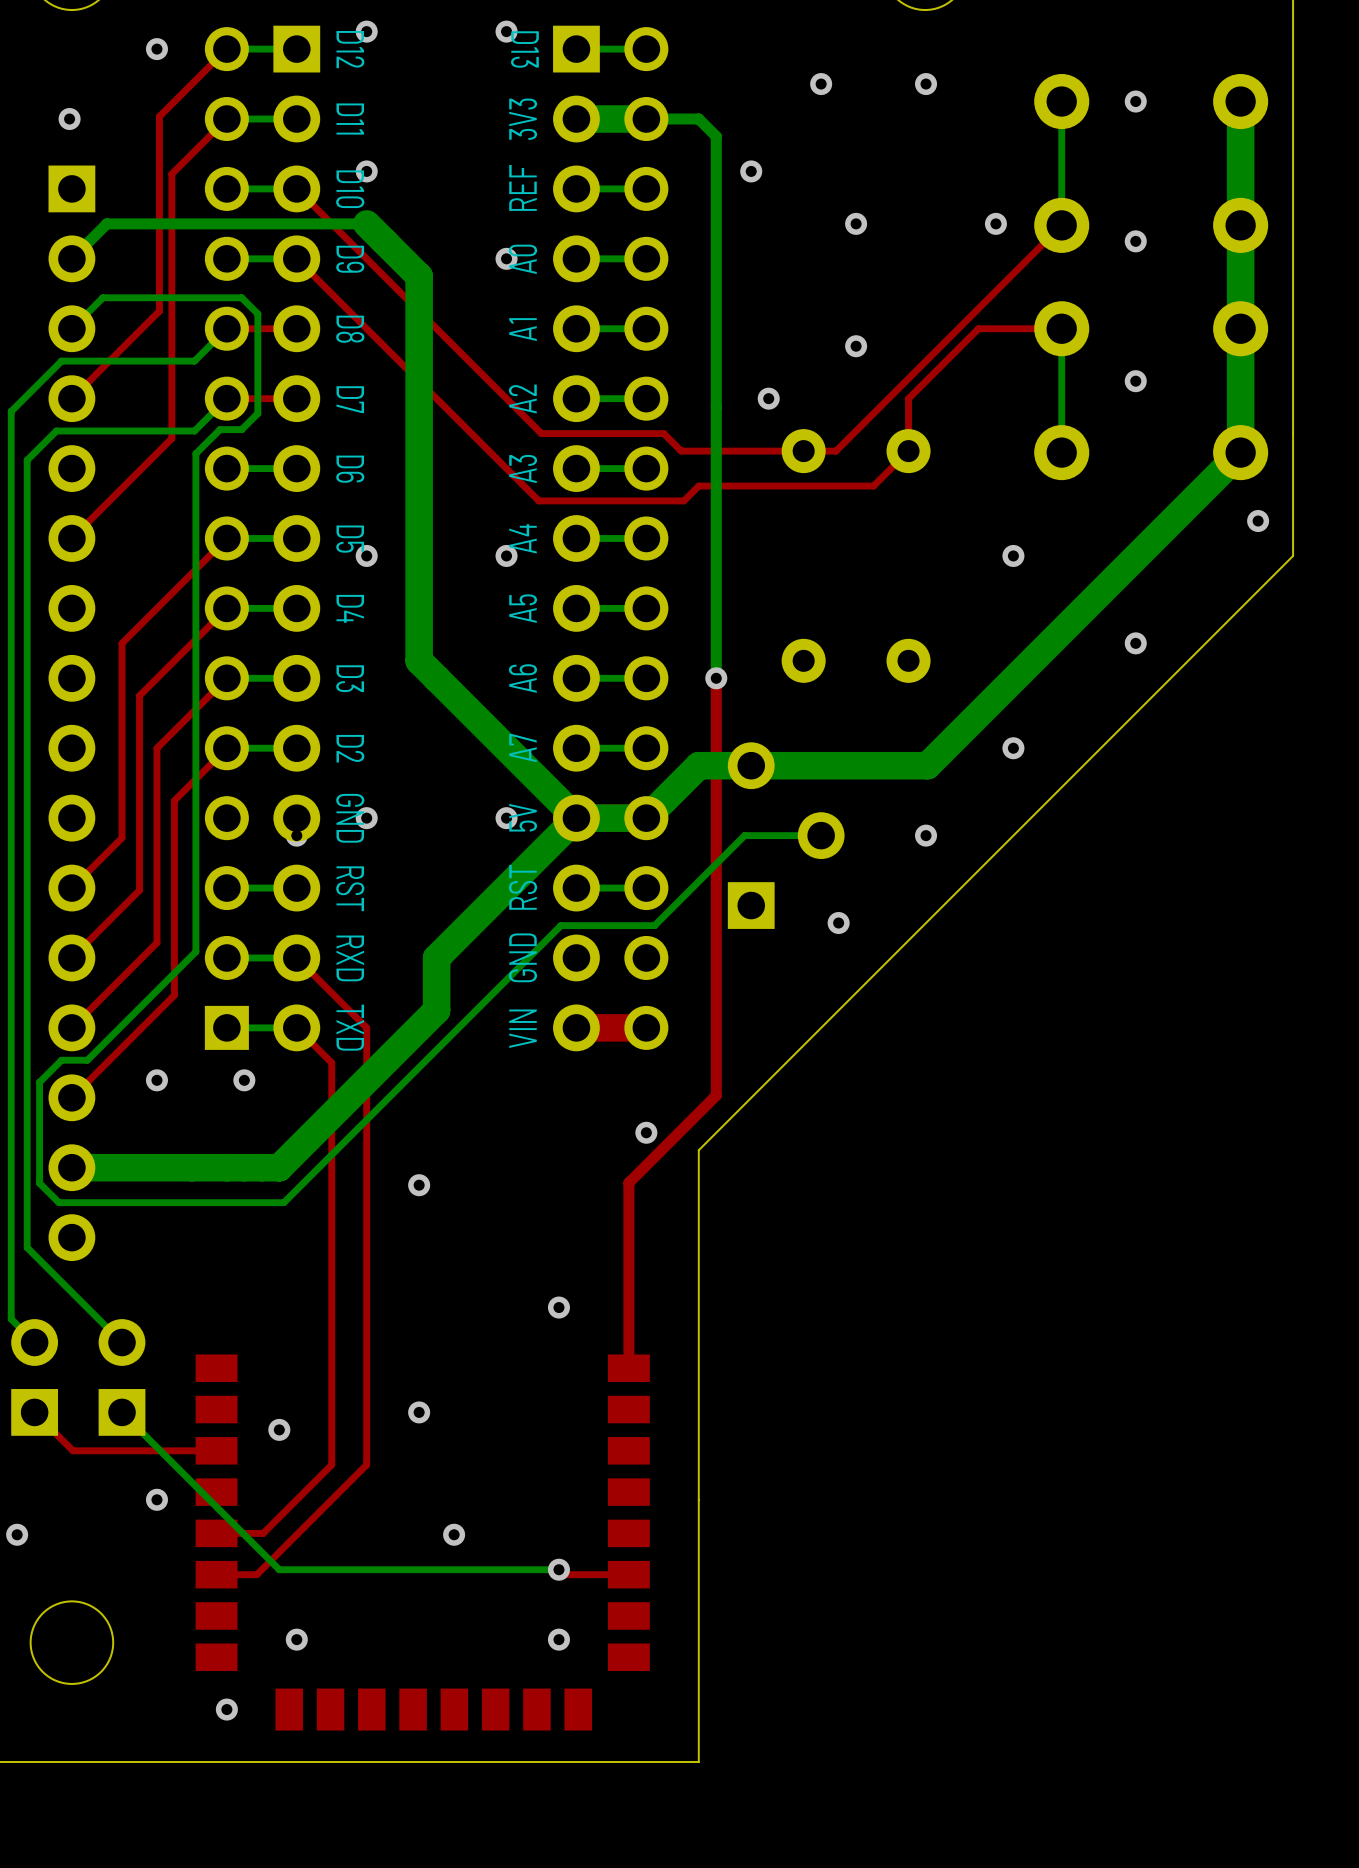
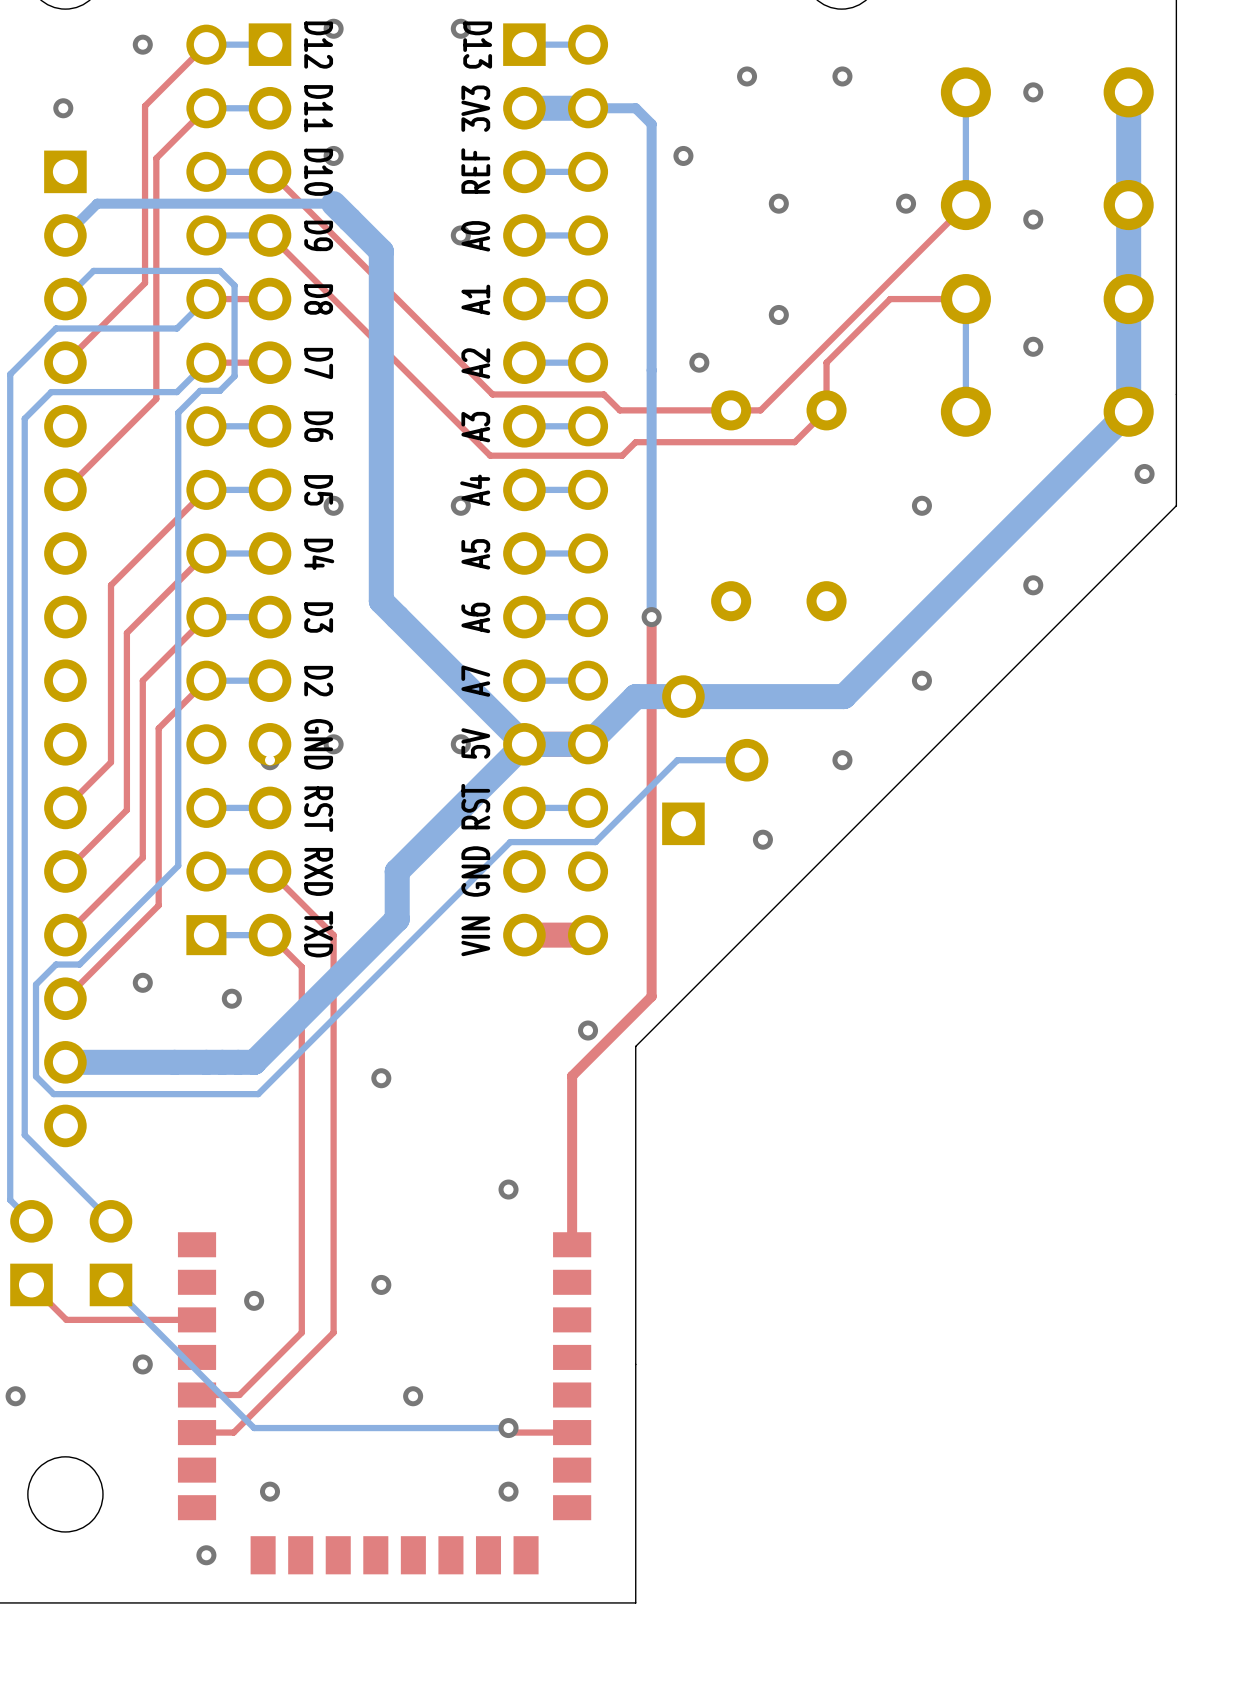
via position: (244, 1080) -> (231, 998)

